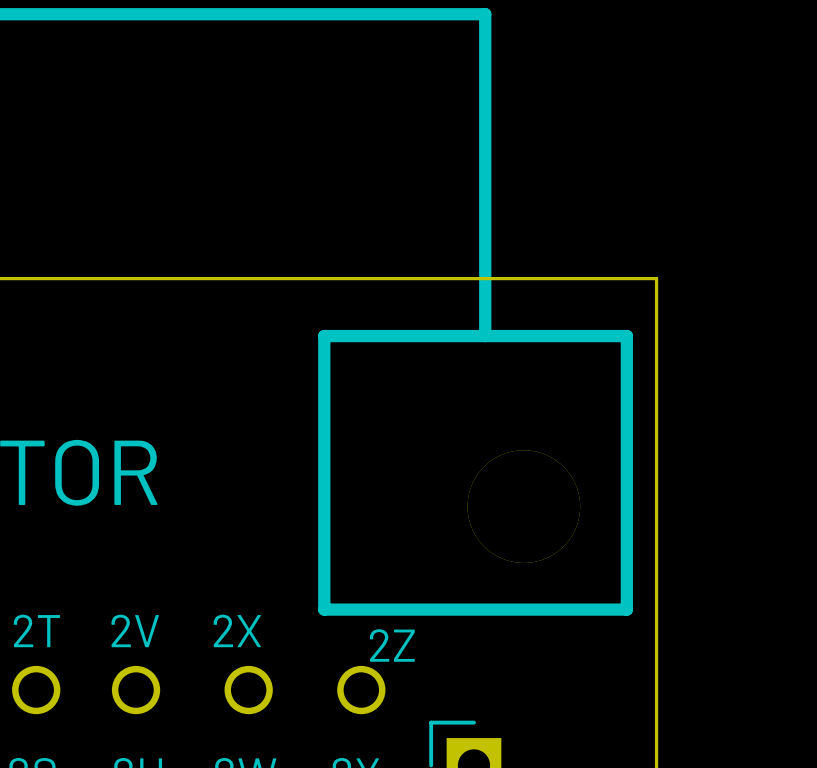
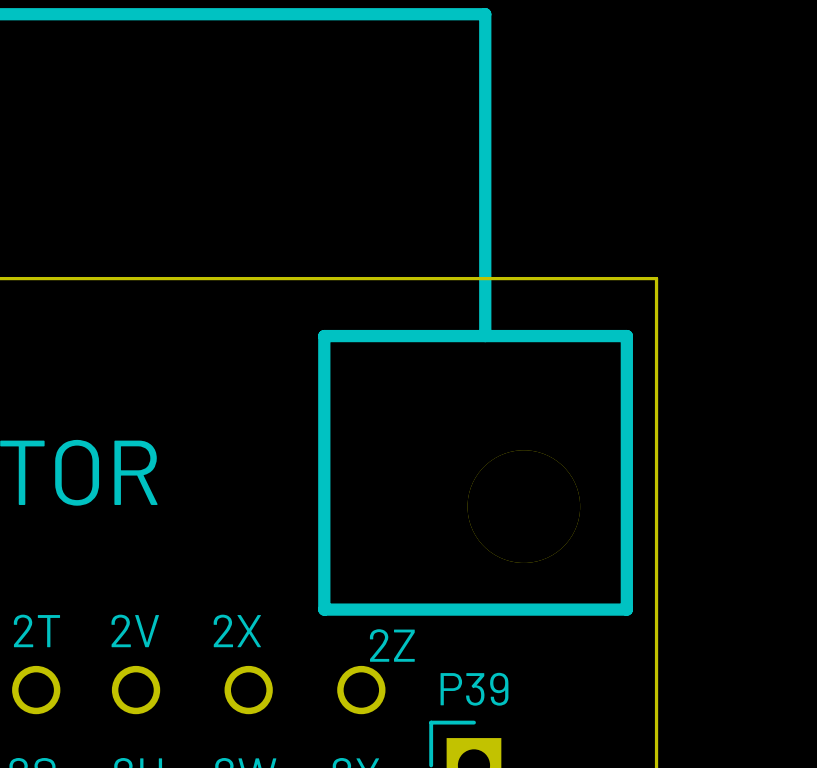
P39 name: none -> P39 (474, 689)

